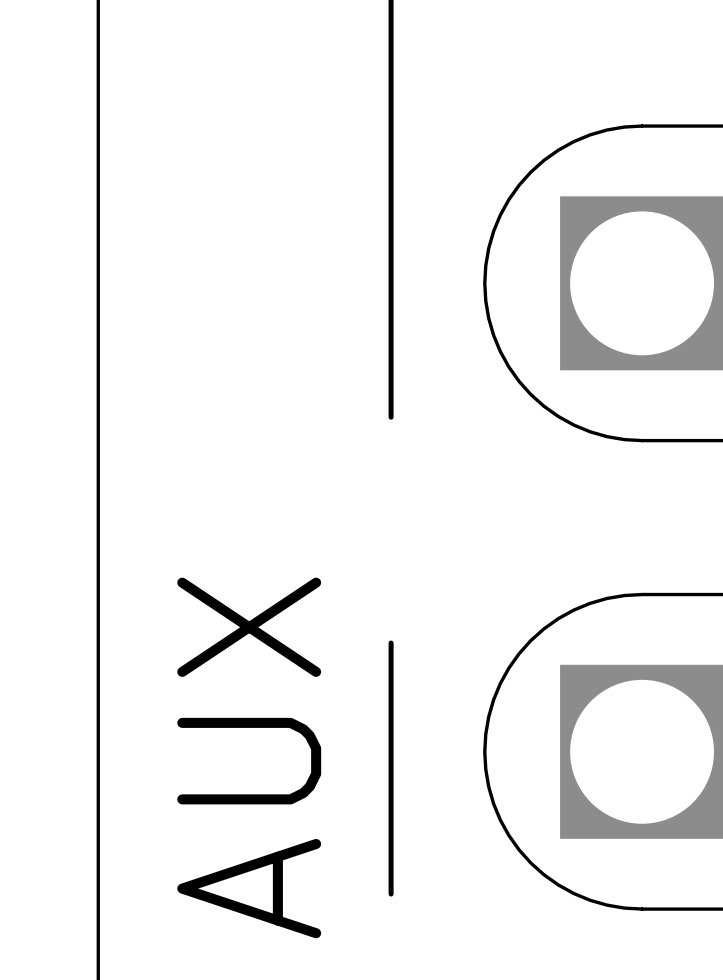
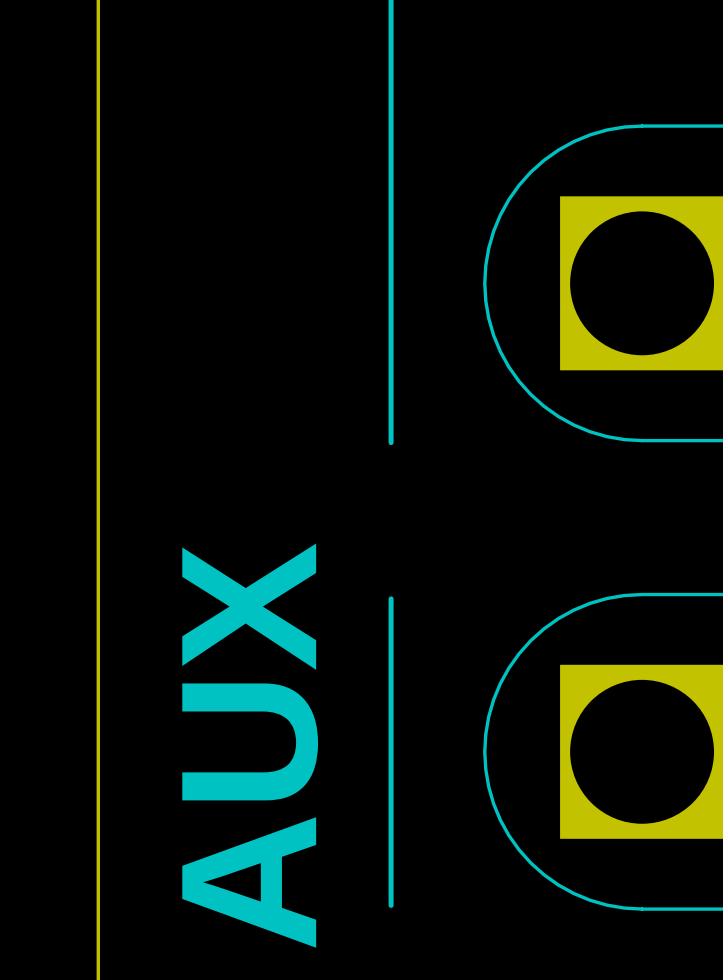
line: none -> (391, 417) (391, 442)
line: none -> (391, 598) (391, 643)
line: none -> (391, 894) (391, 905)

